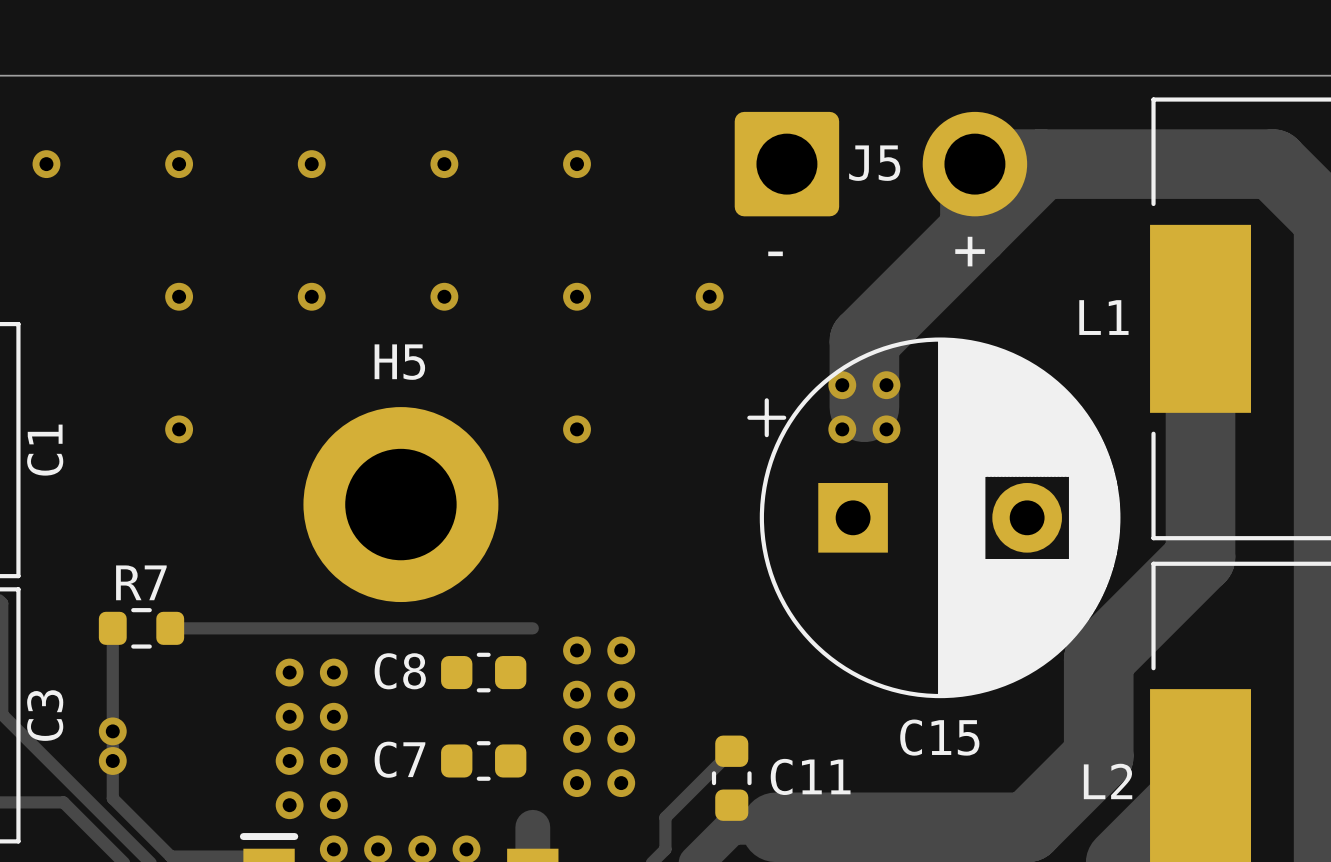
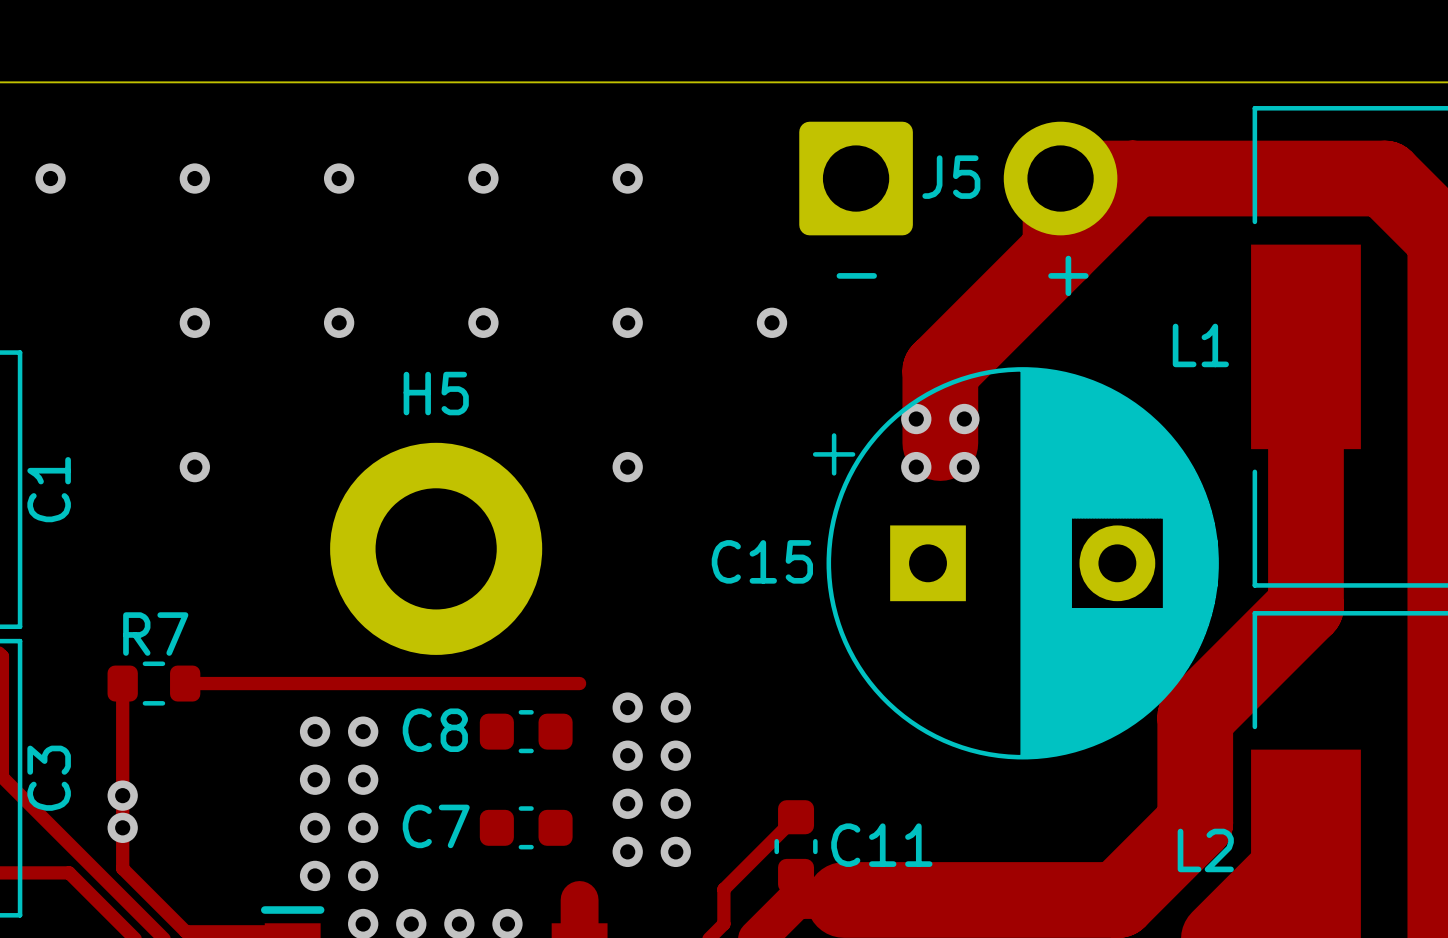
C15 name position: C15 (939, 737) -> C15 (762, 561)

